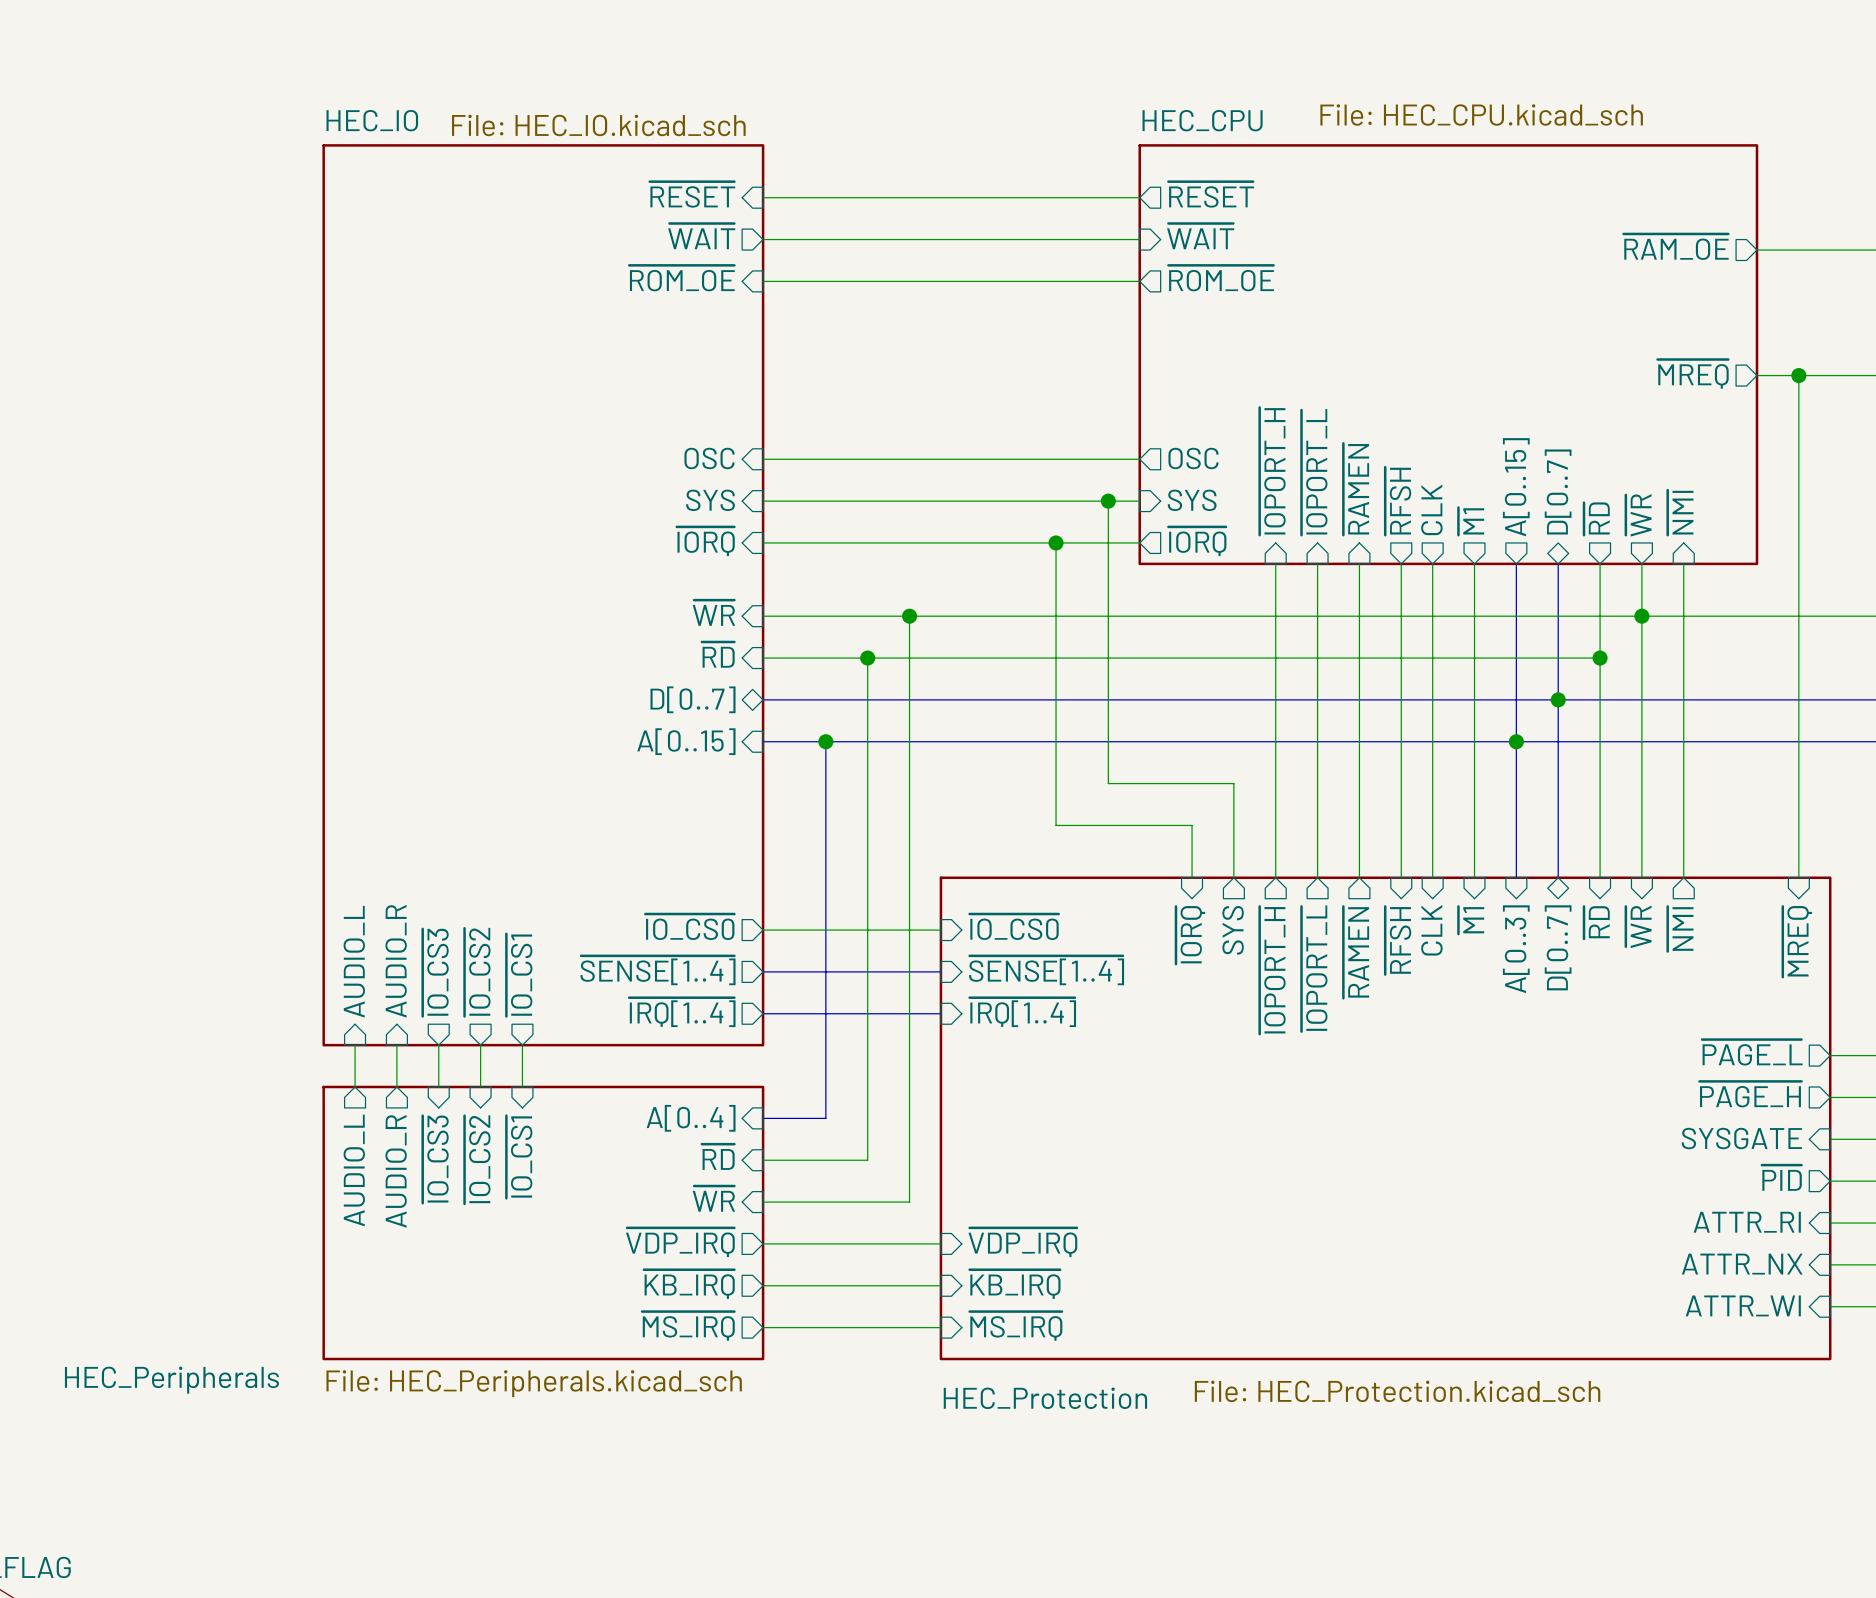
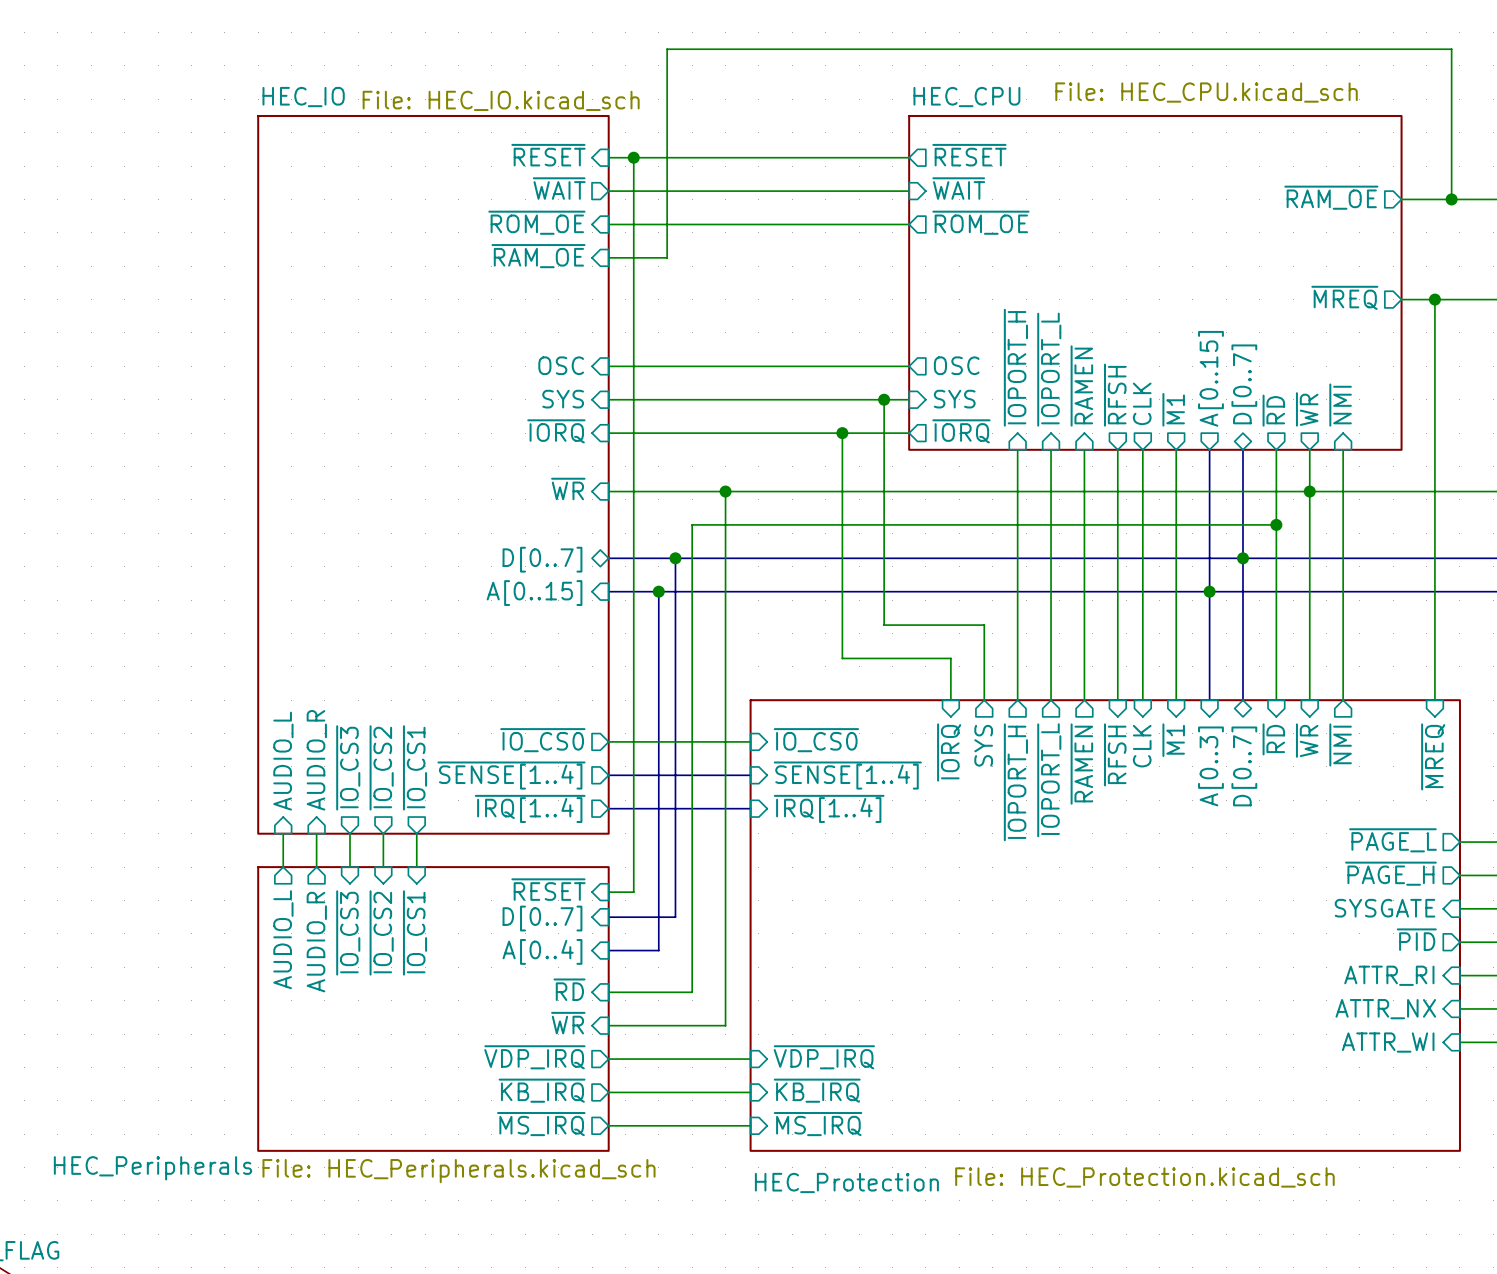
wire: none -> (633, 157) (633, 892) (608, 892)
junction: none -> (633, 157)
wire: none -> (1451, 199) (1451, 49) (667, 49) (667, 257) (608, 257)
junction: none -> (1451, 199)
sheet pin: none -> ~{RAM_OE} (538, 256)
sheet pin: ~{RD} (718, 654) -> none
wire: (763, 658) (867, 658) -> none
junction position: (867, 658) -> (675, 558)
bus: none -> (675, 558) (675, 917) (608, 917)
sheet pin: A[0..4] (691, 1118) -> ~{RESET} (548, 889)
bus: (763, 1118) (825, 1118) -> (608, 950) (658, 950) (658, 892)
sheet HEC_Protection: File: HEC_Protection.kicad_sch (1385, 1118) -> none
sheet pin: ~{RD} (718, 1157) -> D[0..7] (542, 918)
wire: (763, 1160) (867, 1160) -> none
sheet HEC_Protection: none -> File: HEC_Protection.kicad_sch (1105, 925)
sheet pin: ~{WR} (713, 1198) -> A[0..4] (542, 951)
wire: (763, 1202) (909, 1202) -> none
sheet HEC_Peripherals: File: HEC_Peripherals.kicad_sch (543, 1223) -> none
sheet pin shape: output (680, 1242) -> input (569, 989)
sheet pin: ~{VDP_IRQ} (680, 1242) -> ~{RD} (569, 989)
sheet pin: ~{VDP_IRQ} (1022, 1242) -> none
wire: (867, 1243) (940, 1243) -> (692, 992) (692, 925)
sheet HEC_Peripherals: none -> File: HEC_Peripherals.kicad_sch (433, 1008)
sheet pin shape: output (689, 1284) -> input (568, 1023)
sheet pin: ~{KB_IRQ} (689, 1284) -> ~{WR} (568, 1023)
sheet pin position: ~{KB_IRQ} (1015, 1284) -> ~{KB_IRQ} (817, 1090)
wire: (909, 1285) (940, 1285) -> (725, 1025) (725, 958)
sheet pin: ~{MS_IRQ} (688, 1326) -> ~{VDP_IRQ} (534, 1057)
sheet pin: ~{MS_IRQ} (1015, 1326) -> ~{VDP_IRQ} (824, 1057)
sheet pin: none -> ~{KB_IRQ} (542, 1090)
wire: none -> (608, 1092) (750, 1092)
sheet pin: none -> ~{MS_IRQ} (541, 1124)
sheet pin: none -> ~{MS_IRQ} (818, 1124)
wire: none -> (608, 1125) (750, 1125)

